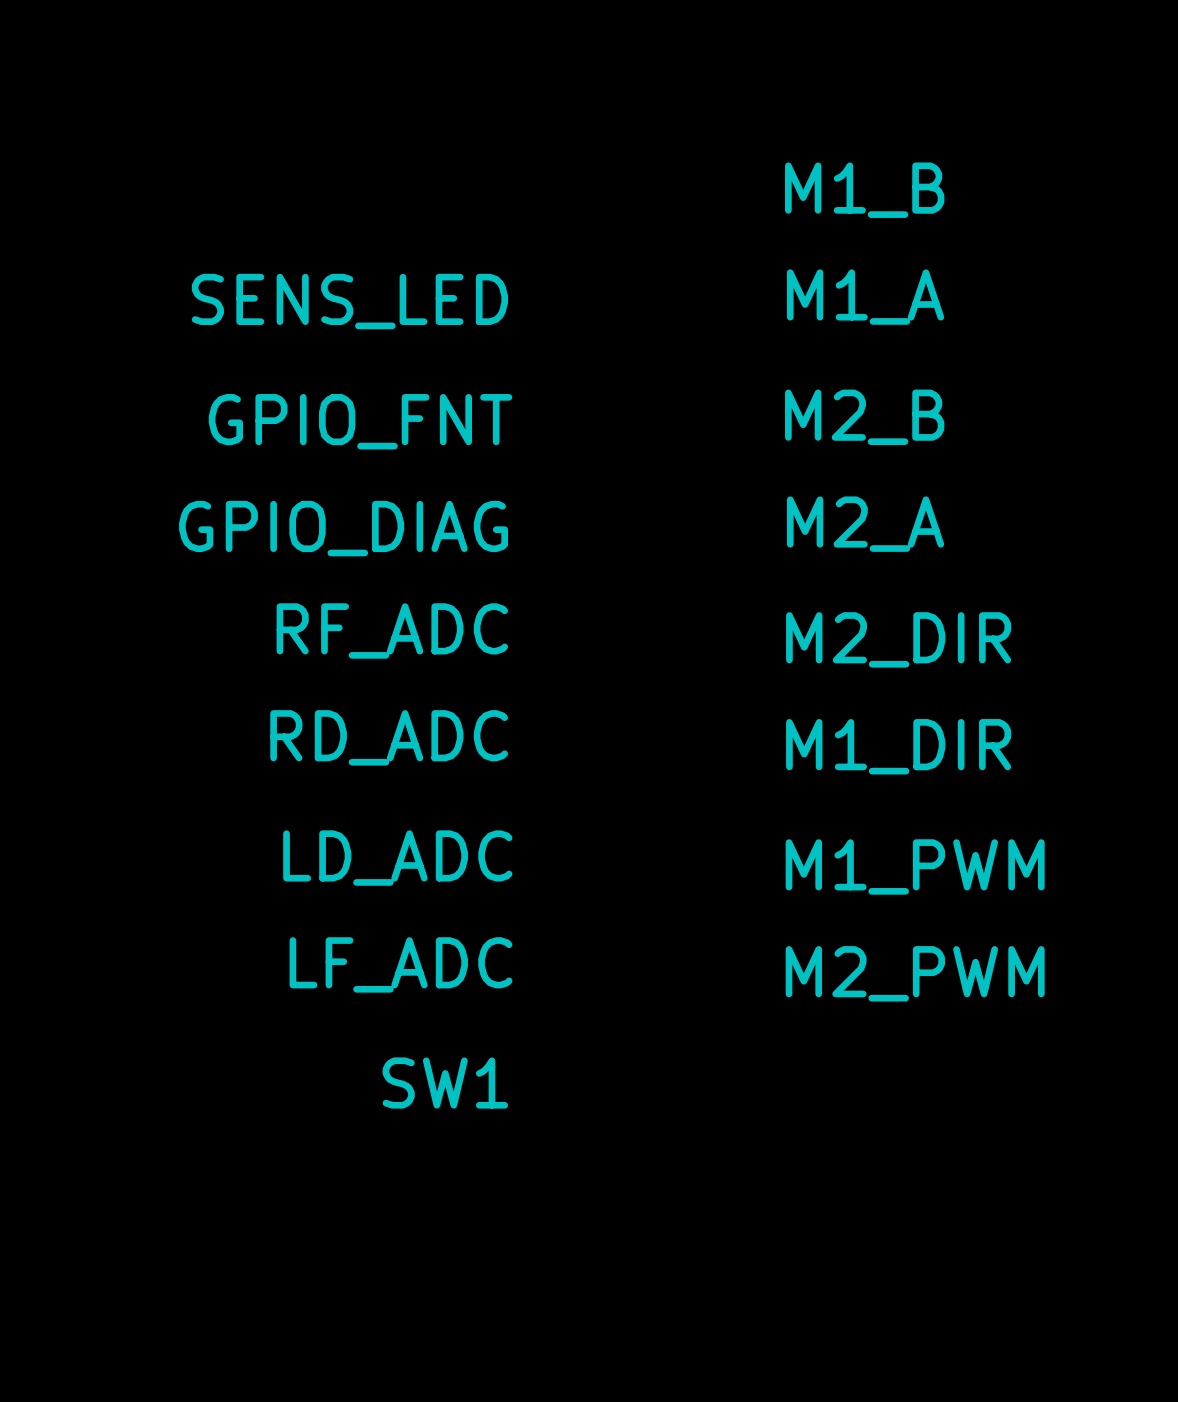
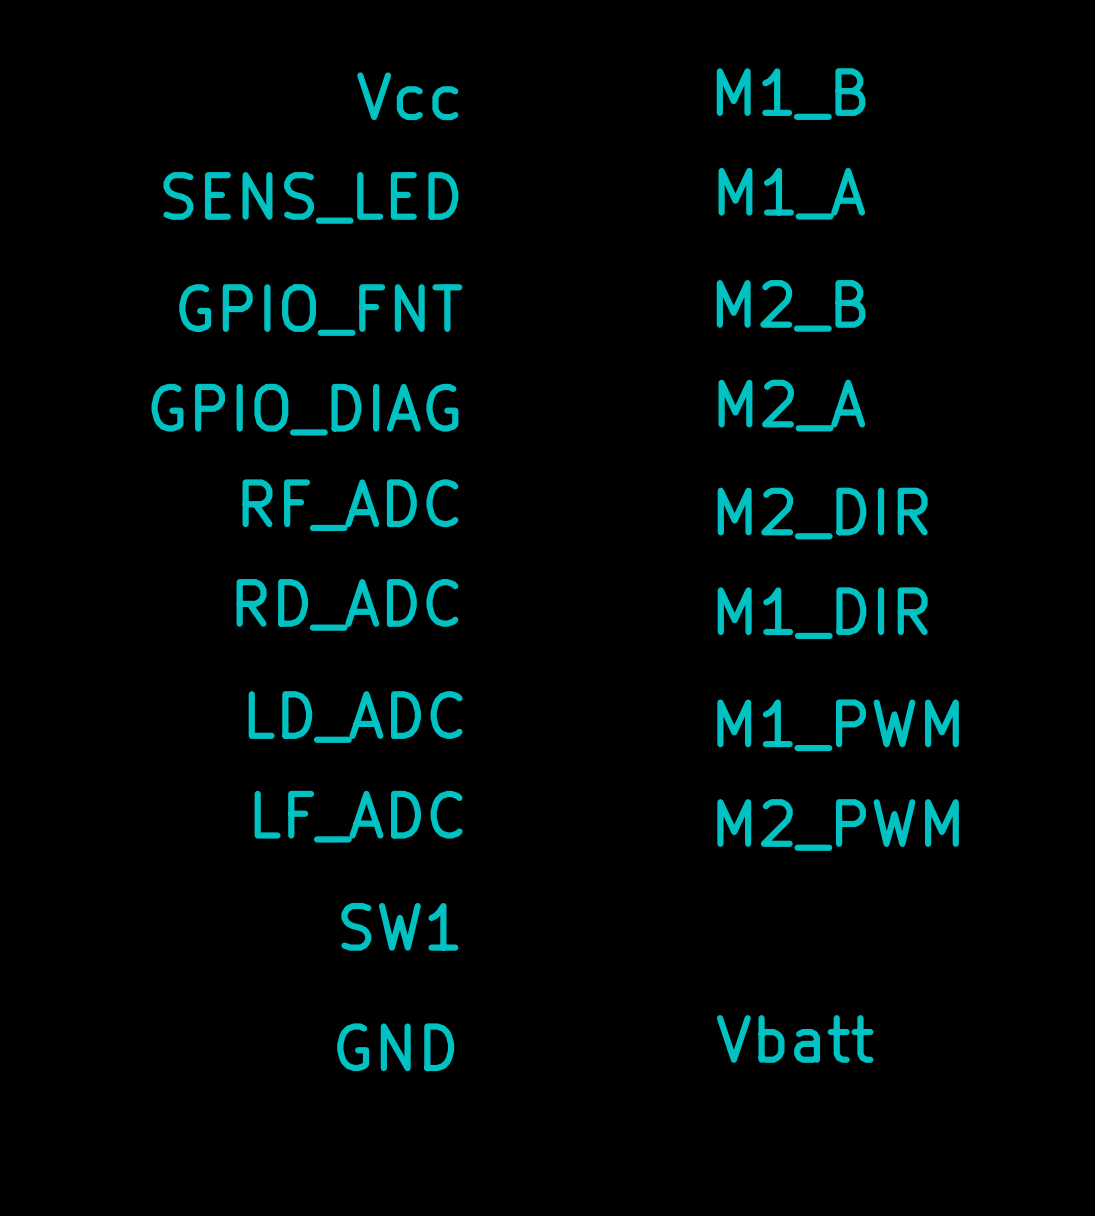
text: none -> Vcc (407, 96)
text: none -> Vbatt (795, 1038)
text: none -> GND (395, 1047)

